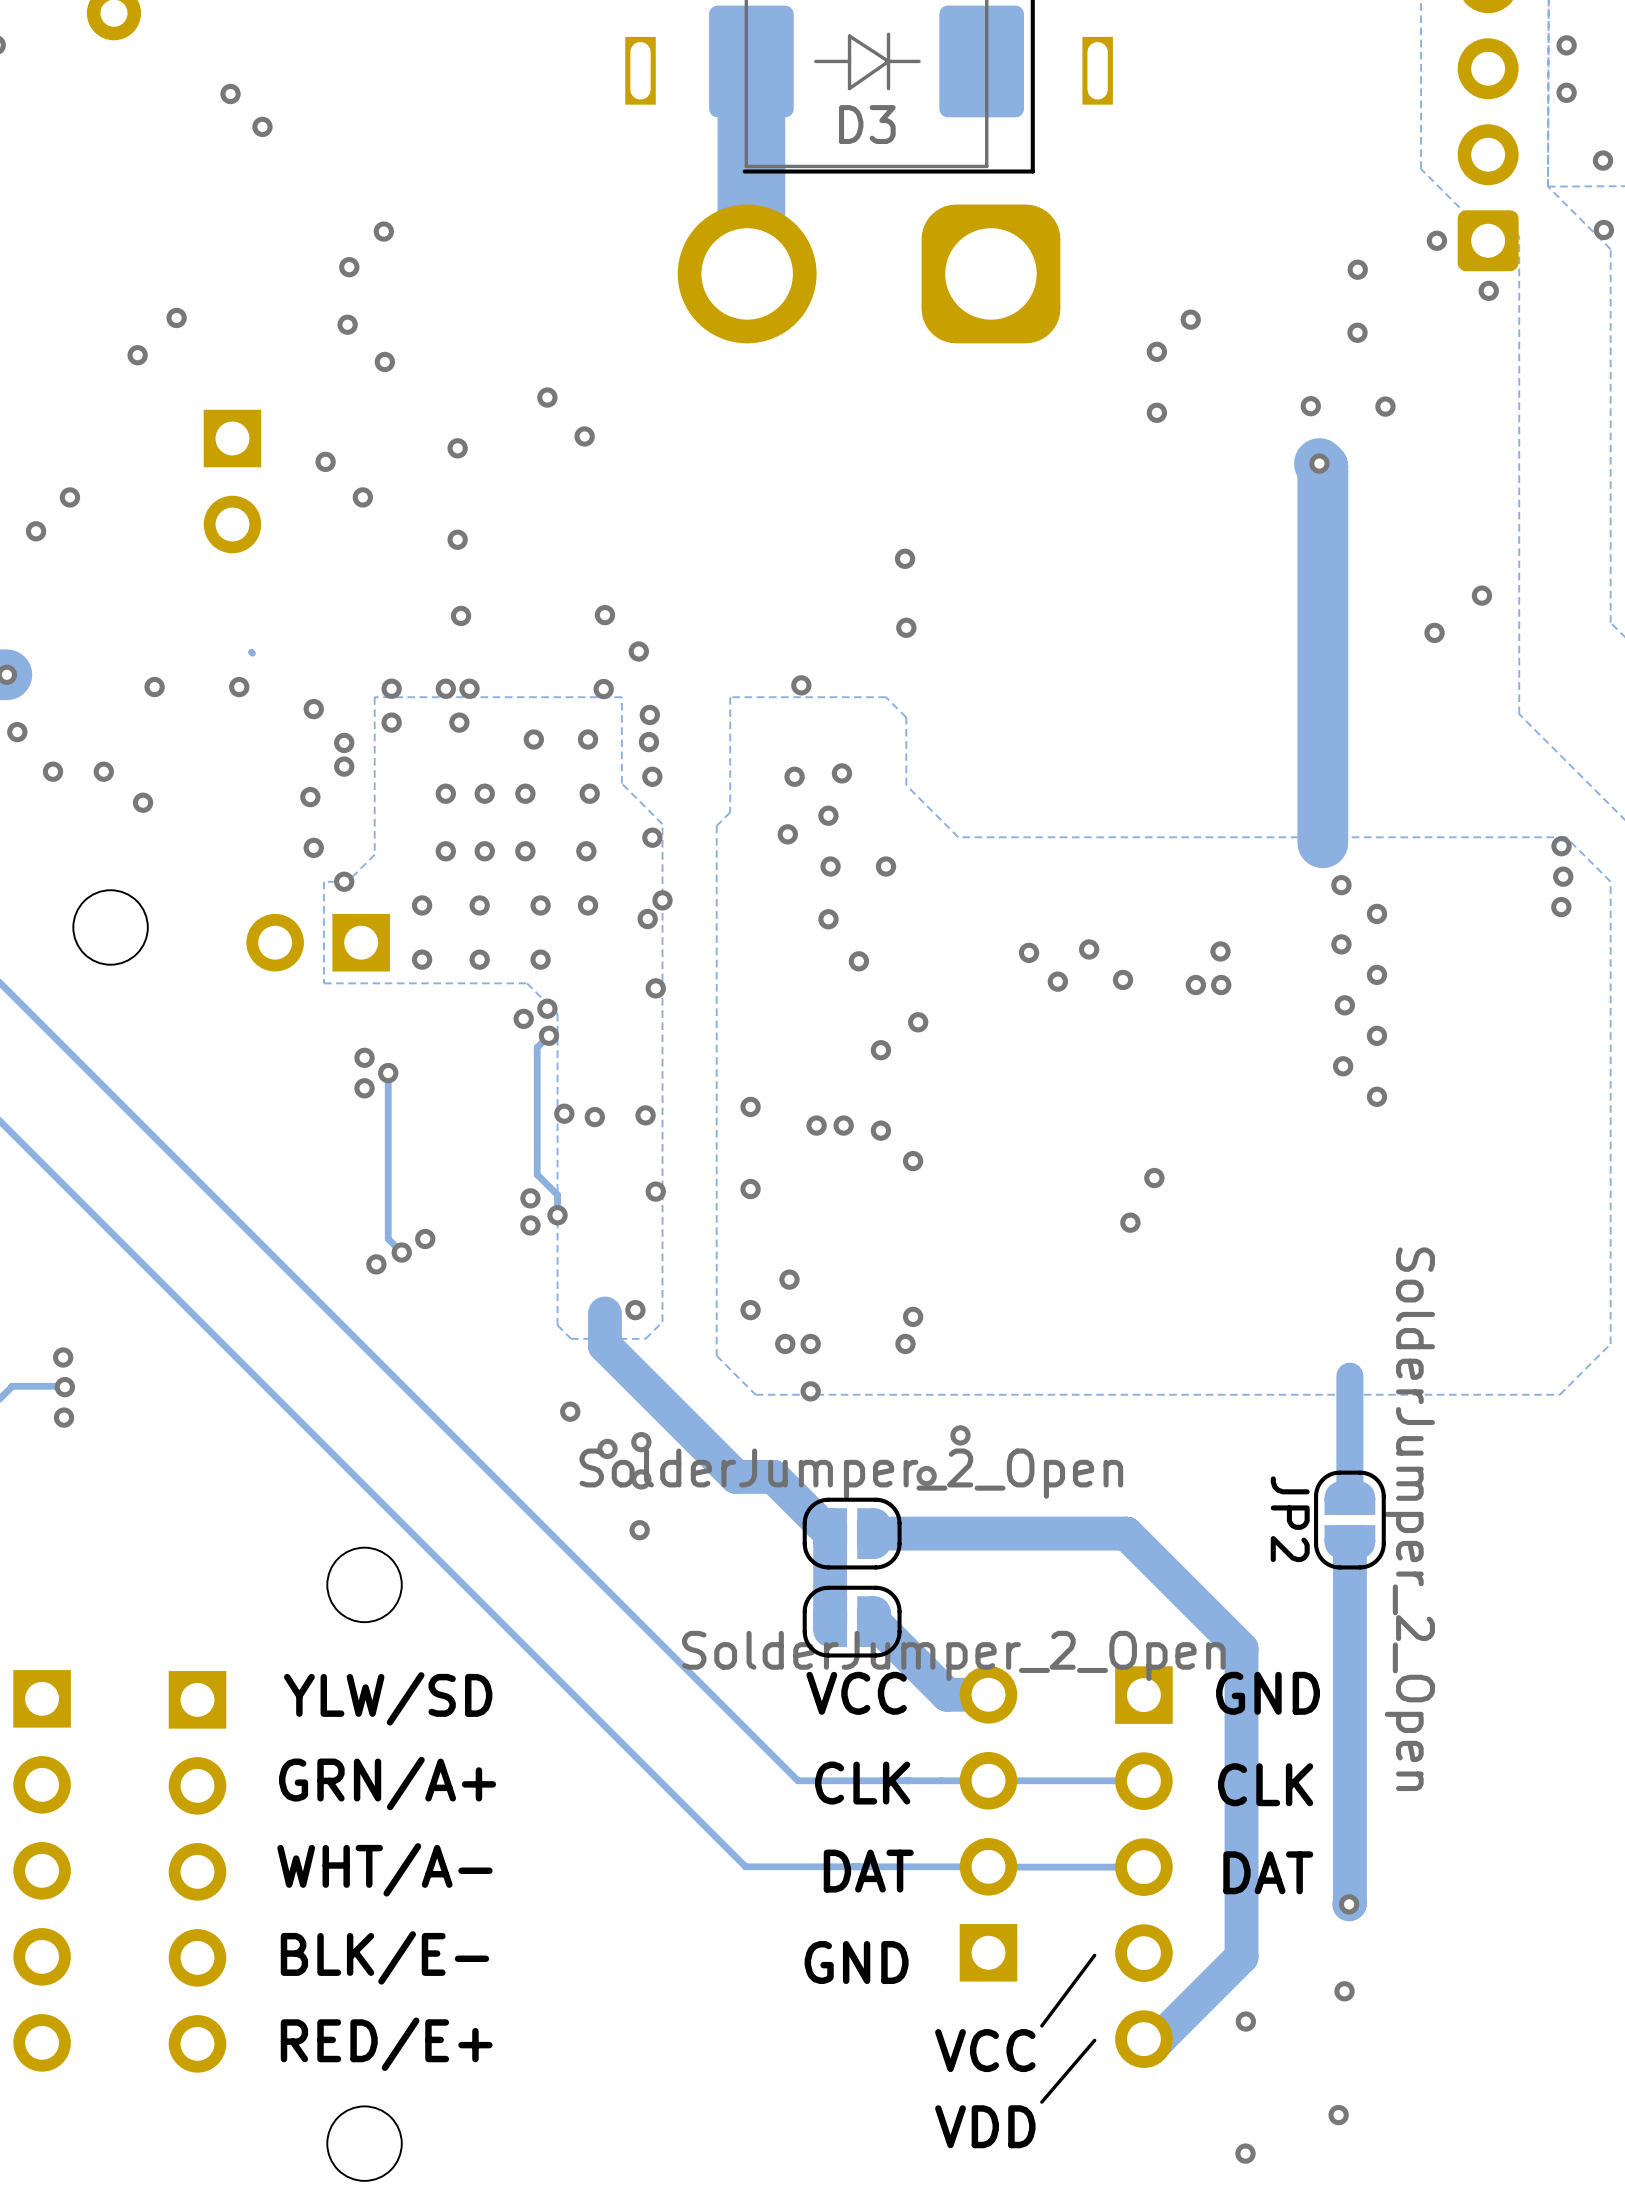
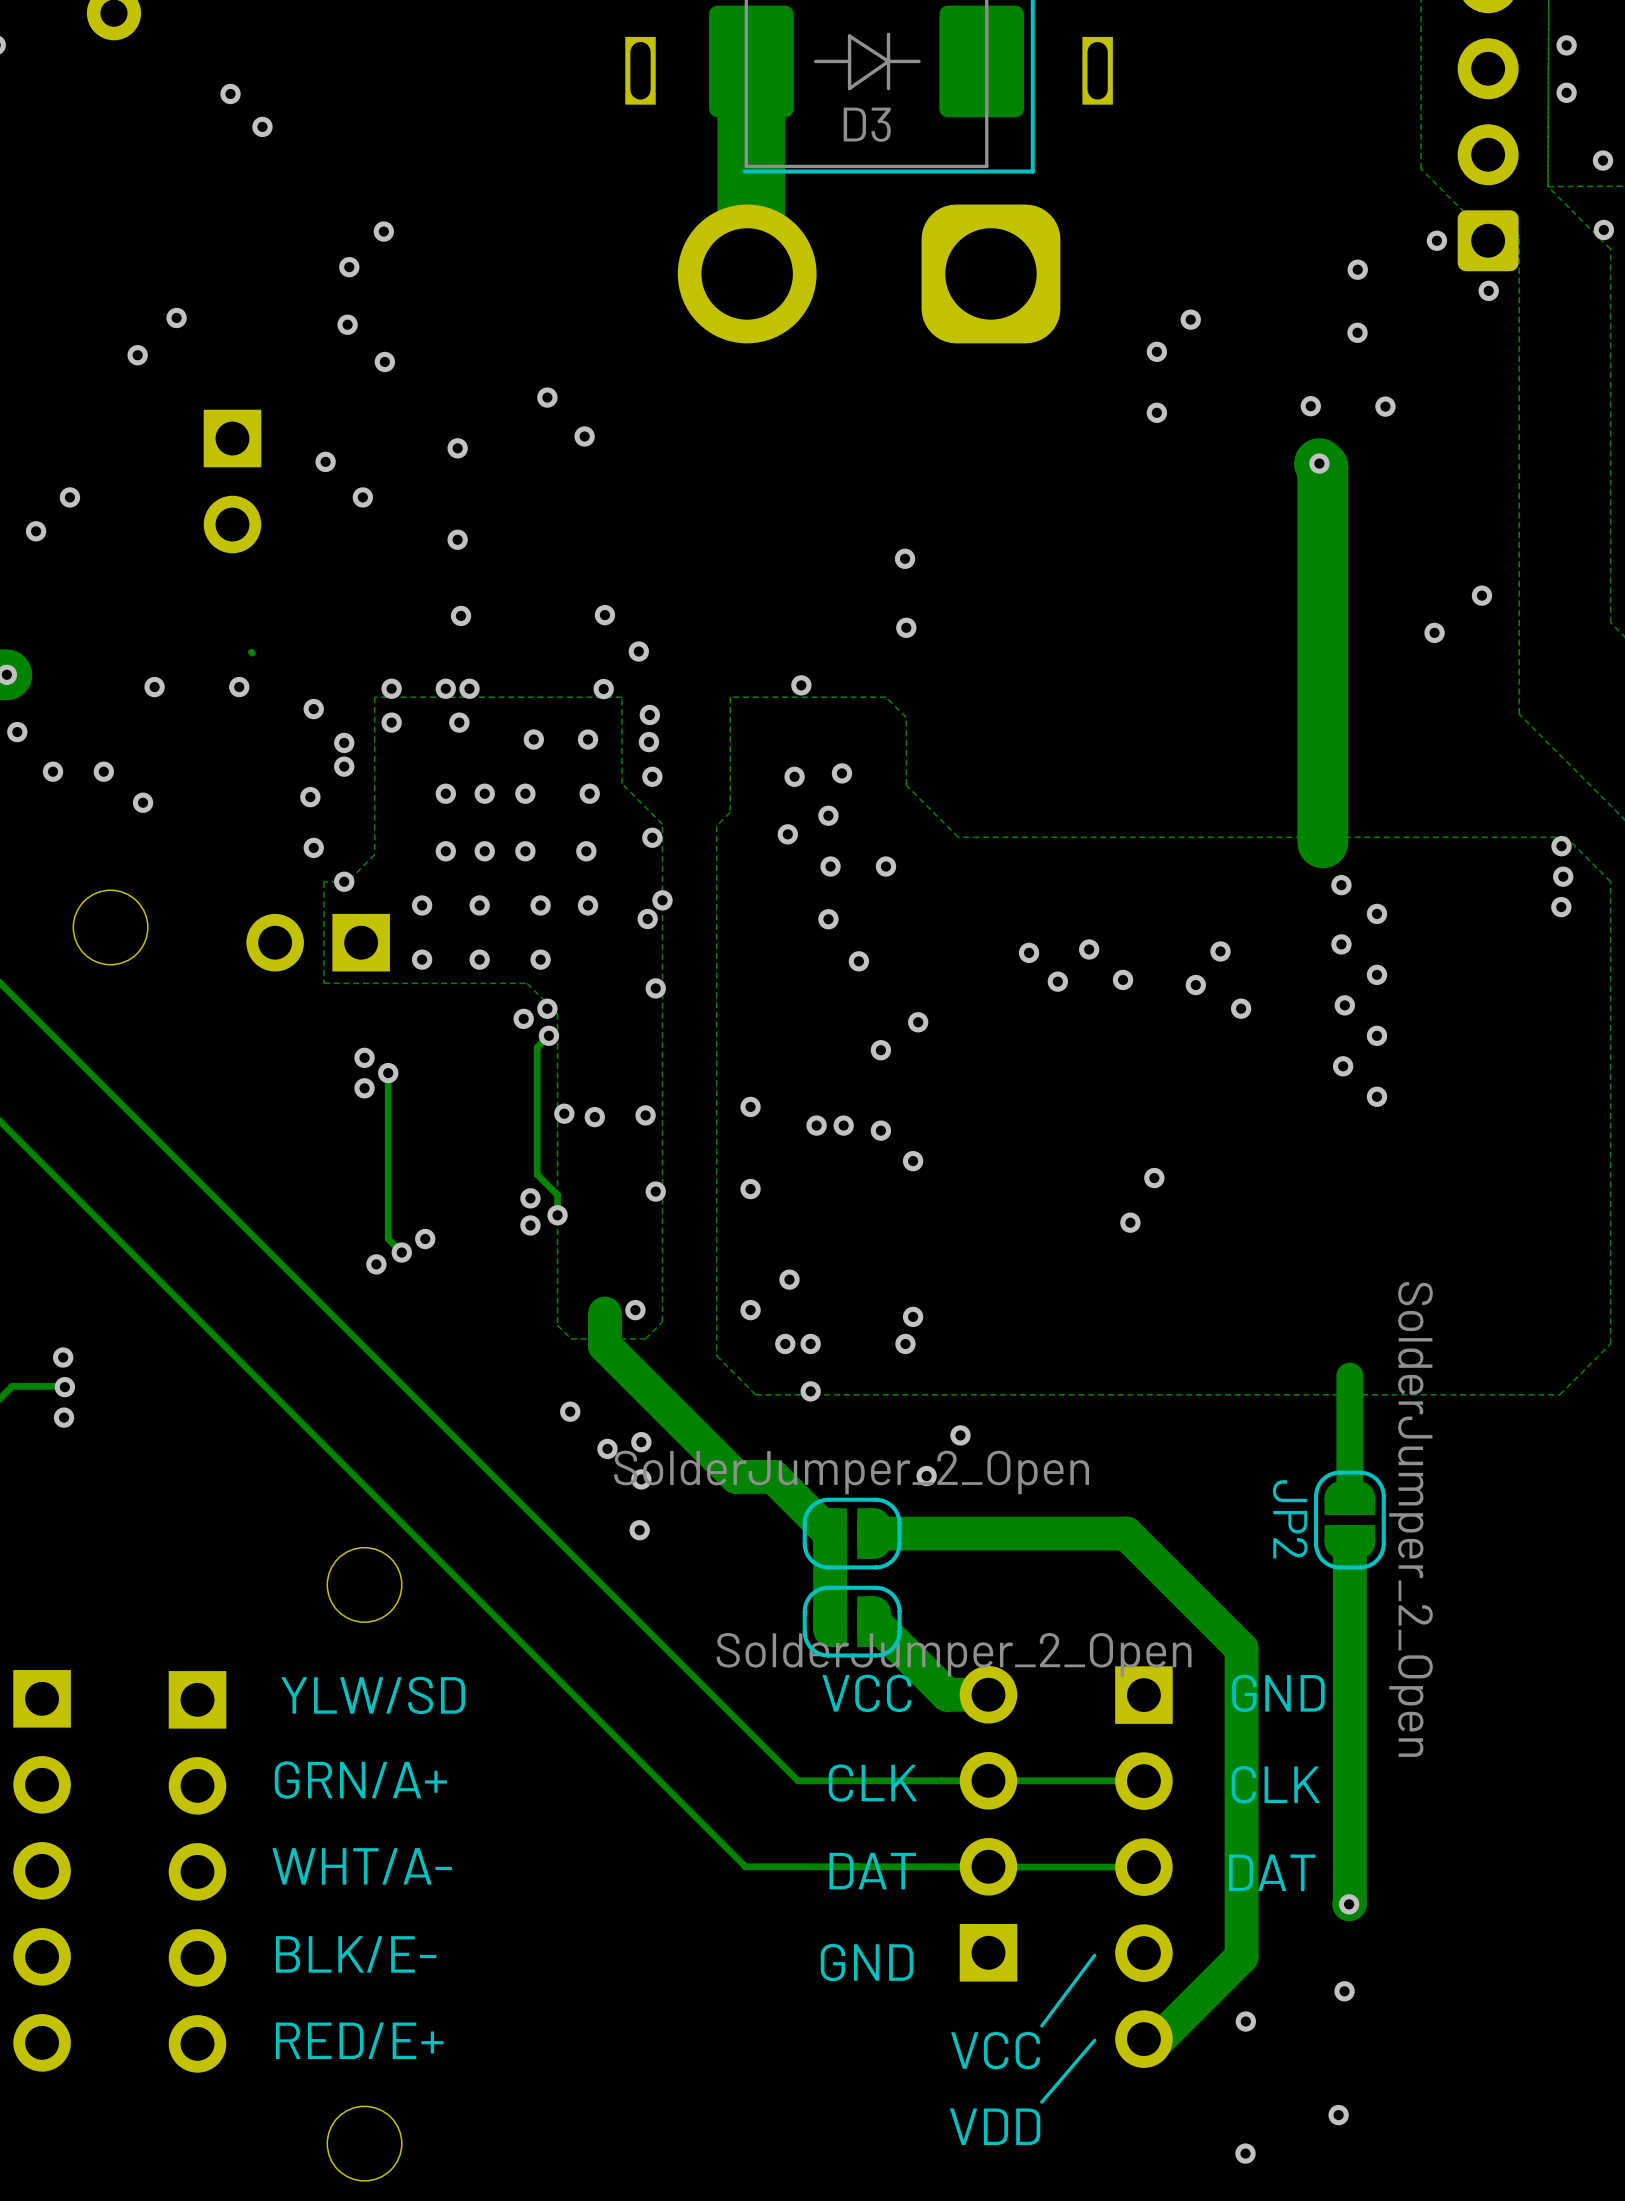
via position: (1221, 985) -> (1241, 1008)

